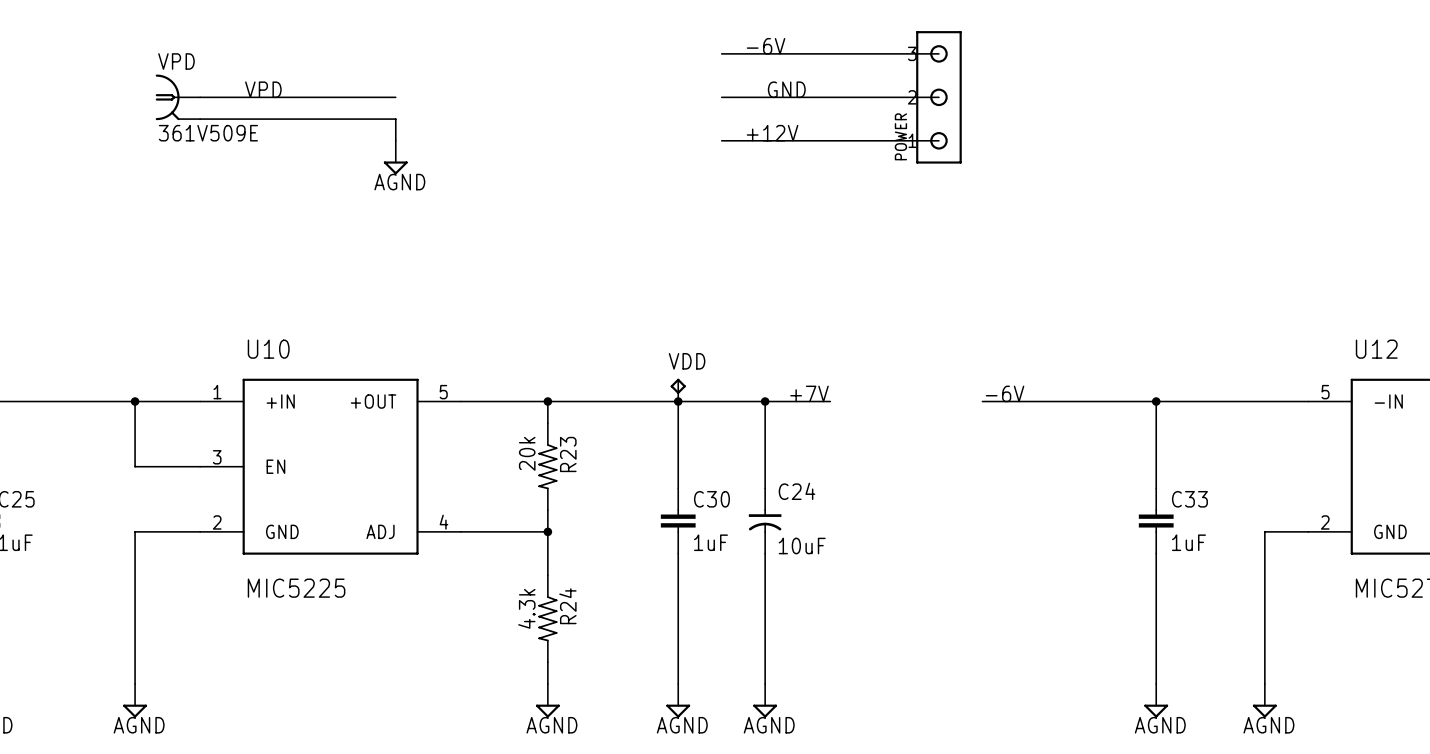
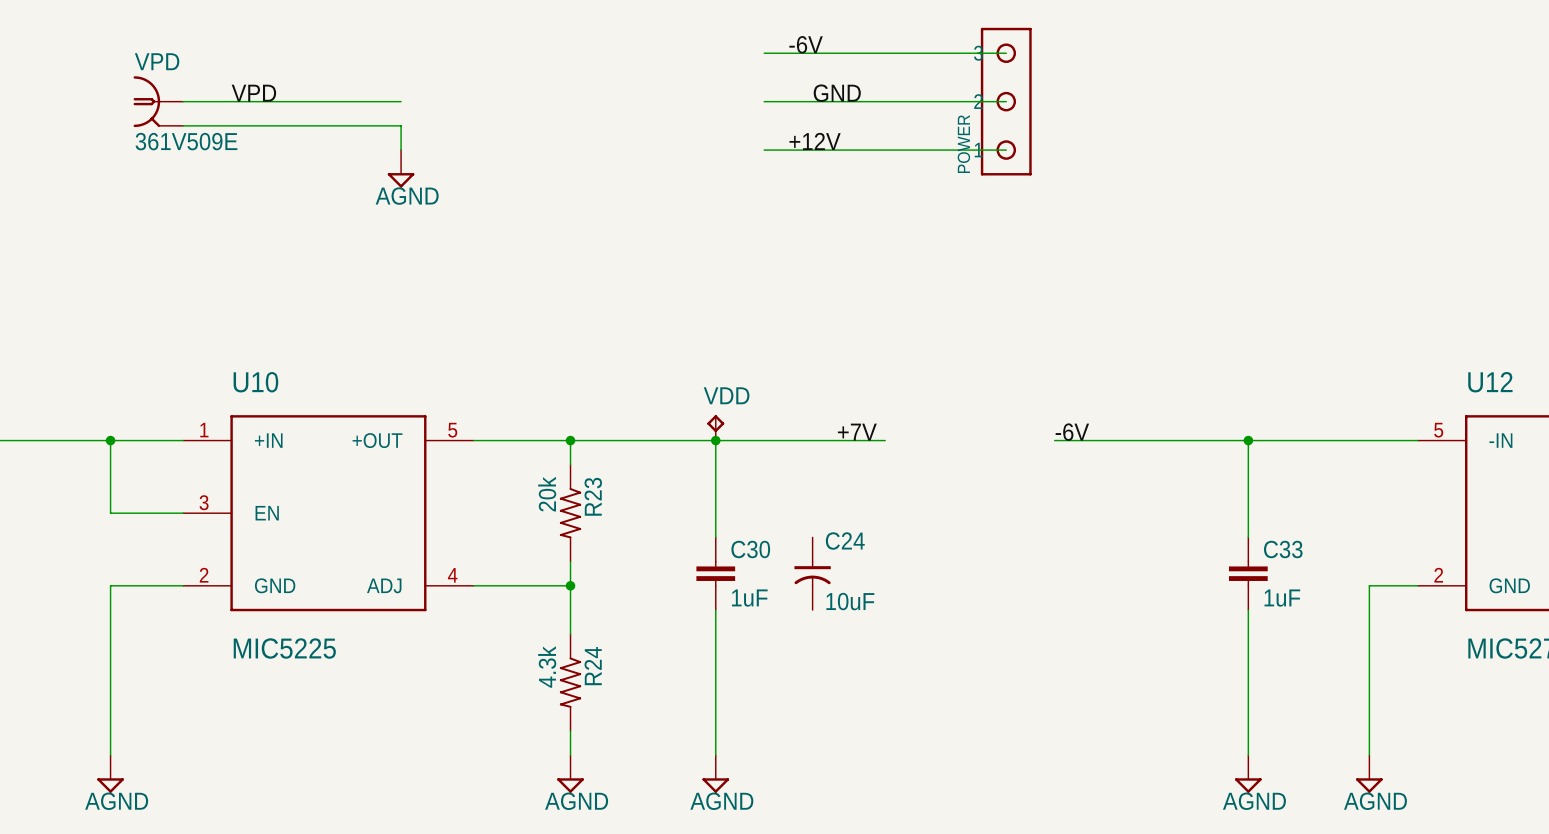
wire: (765, 401) (765, 488) -> none
junction: (765, 401) -> none
wire: (765, 553) (765, 683) -> none
power symbol: AGND (765, 700) -> none

